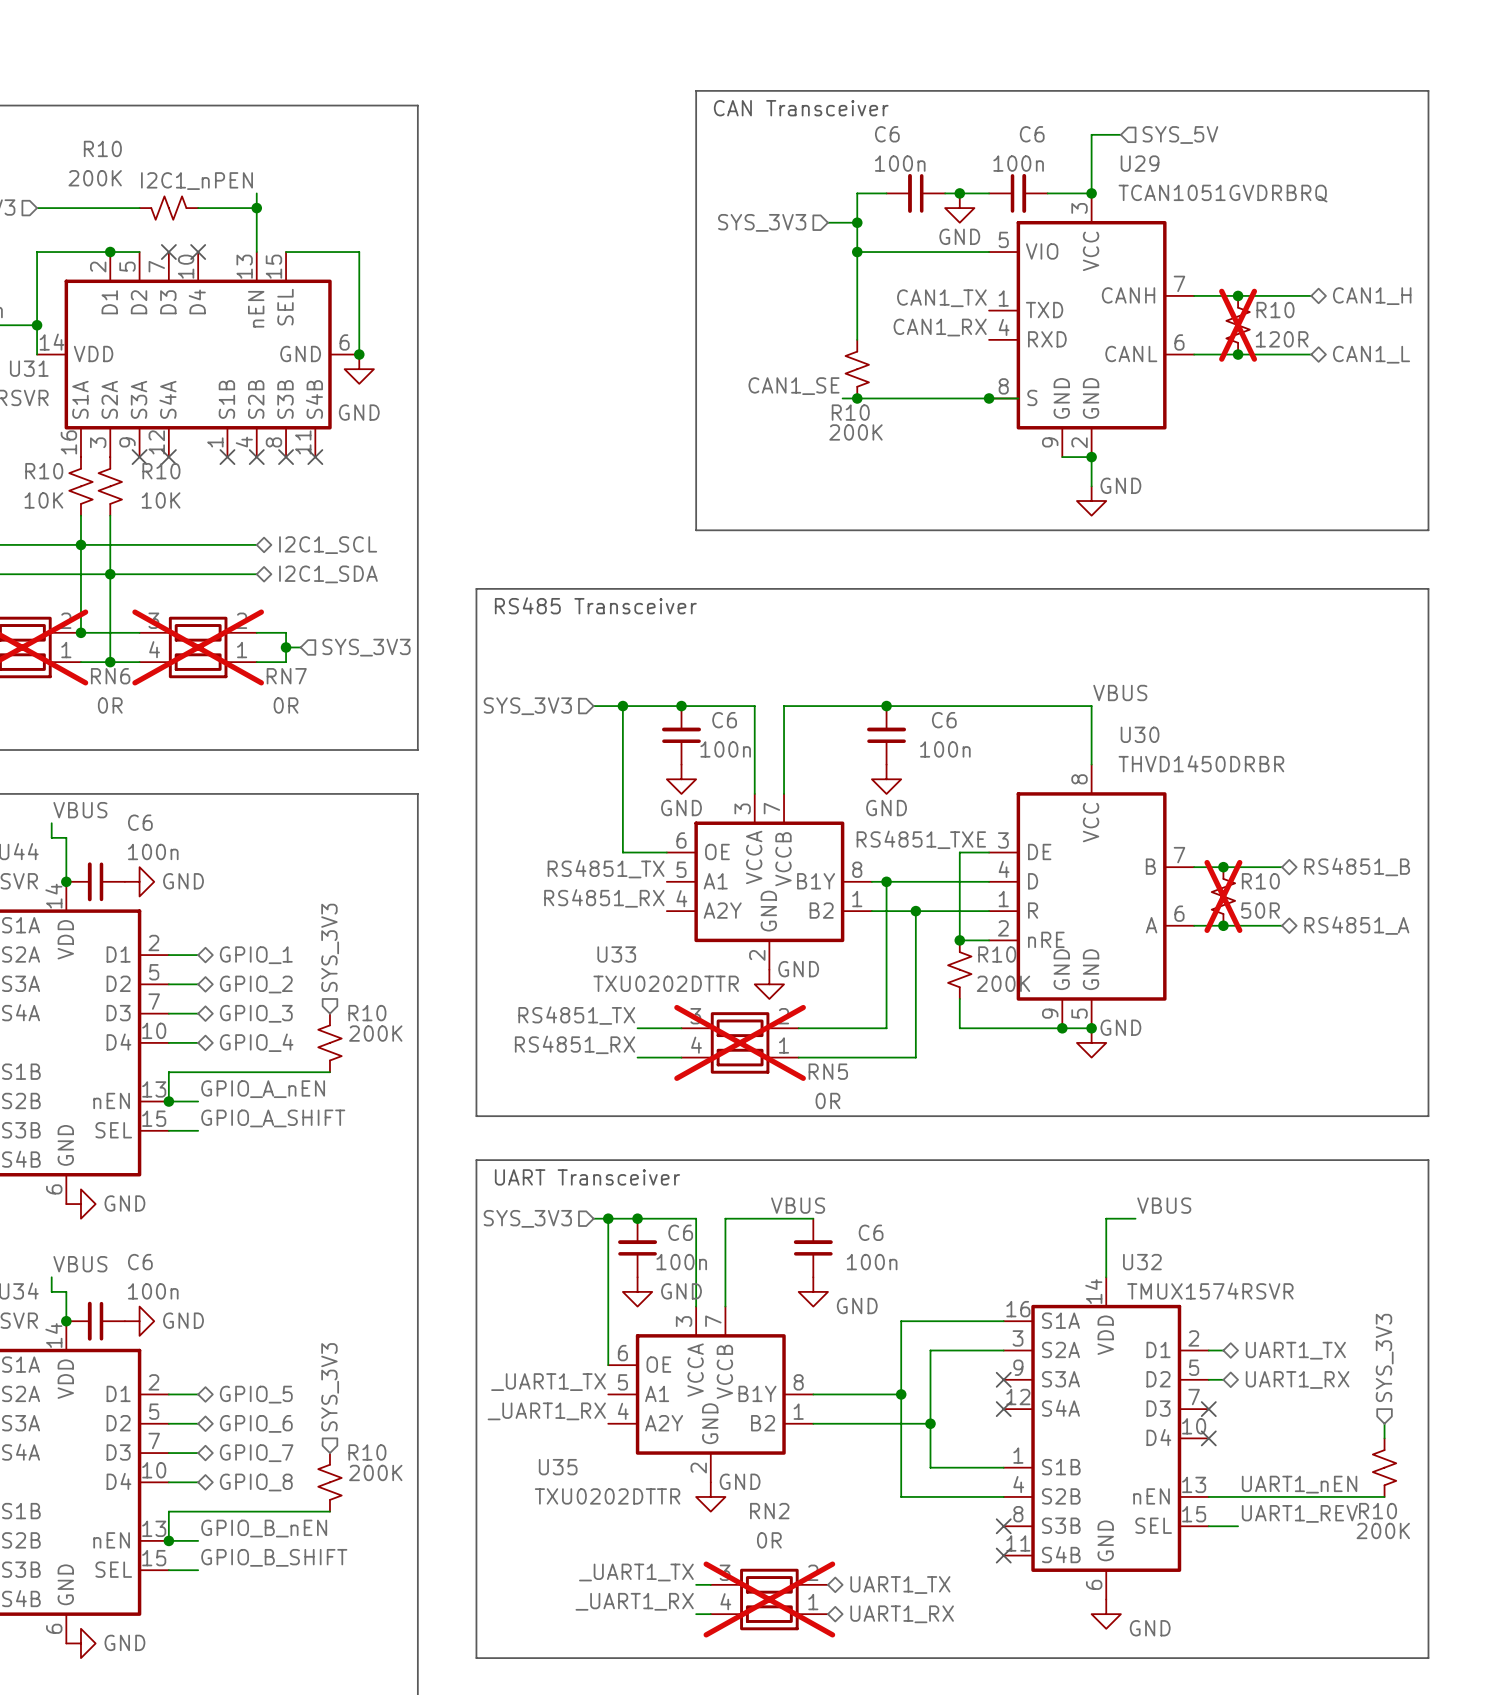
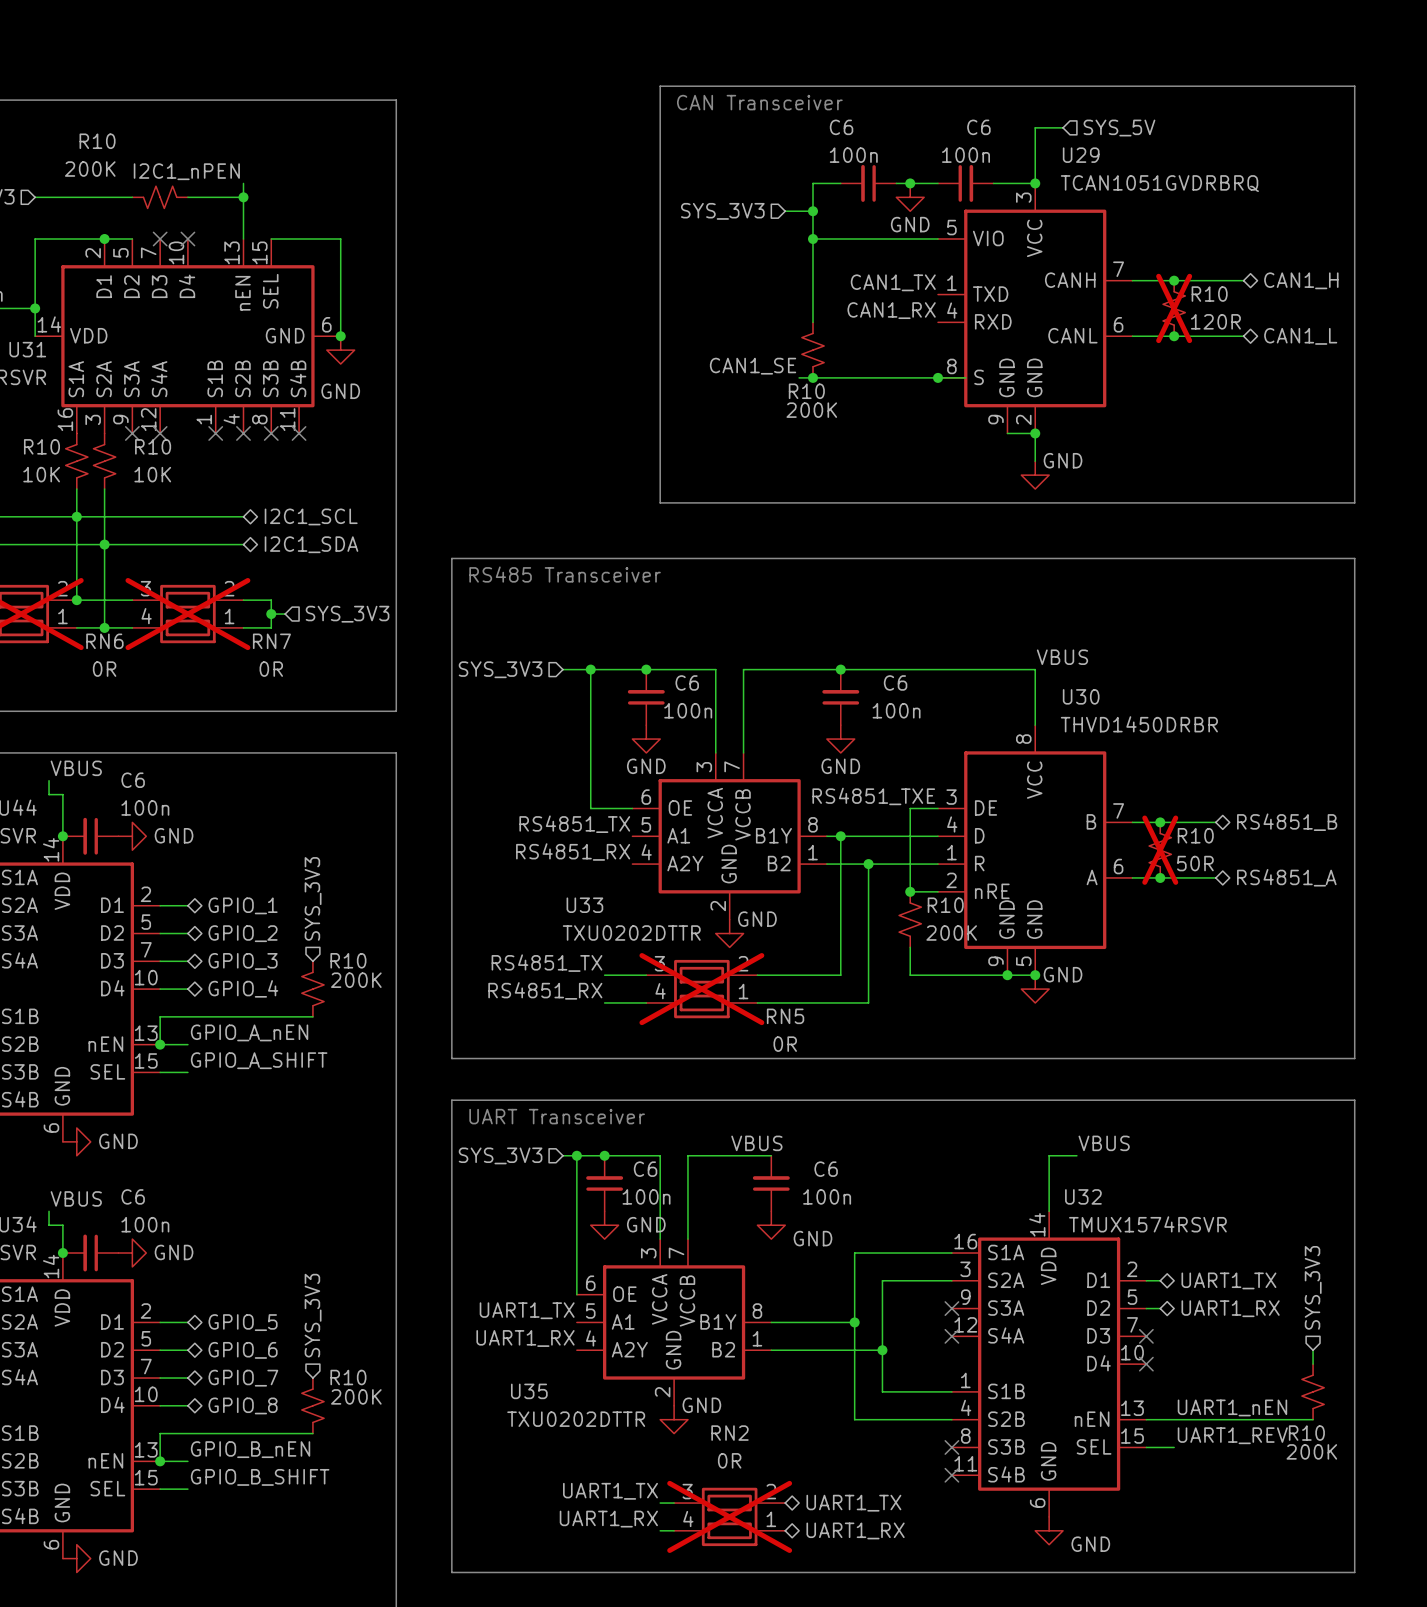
label: _UART1_TX (548, 1382) -> UART1_TX (527, 1310)
label: _UART1_RX (546, 1411) -> UART1_RX (525, 1338)
label: _UART1_TX (636, 1572) -> UART1_TX (610, 1491)
label: _UART1_RX (634, 1601) -> UART1_RX (608, 1519)

